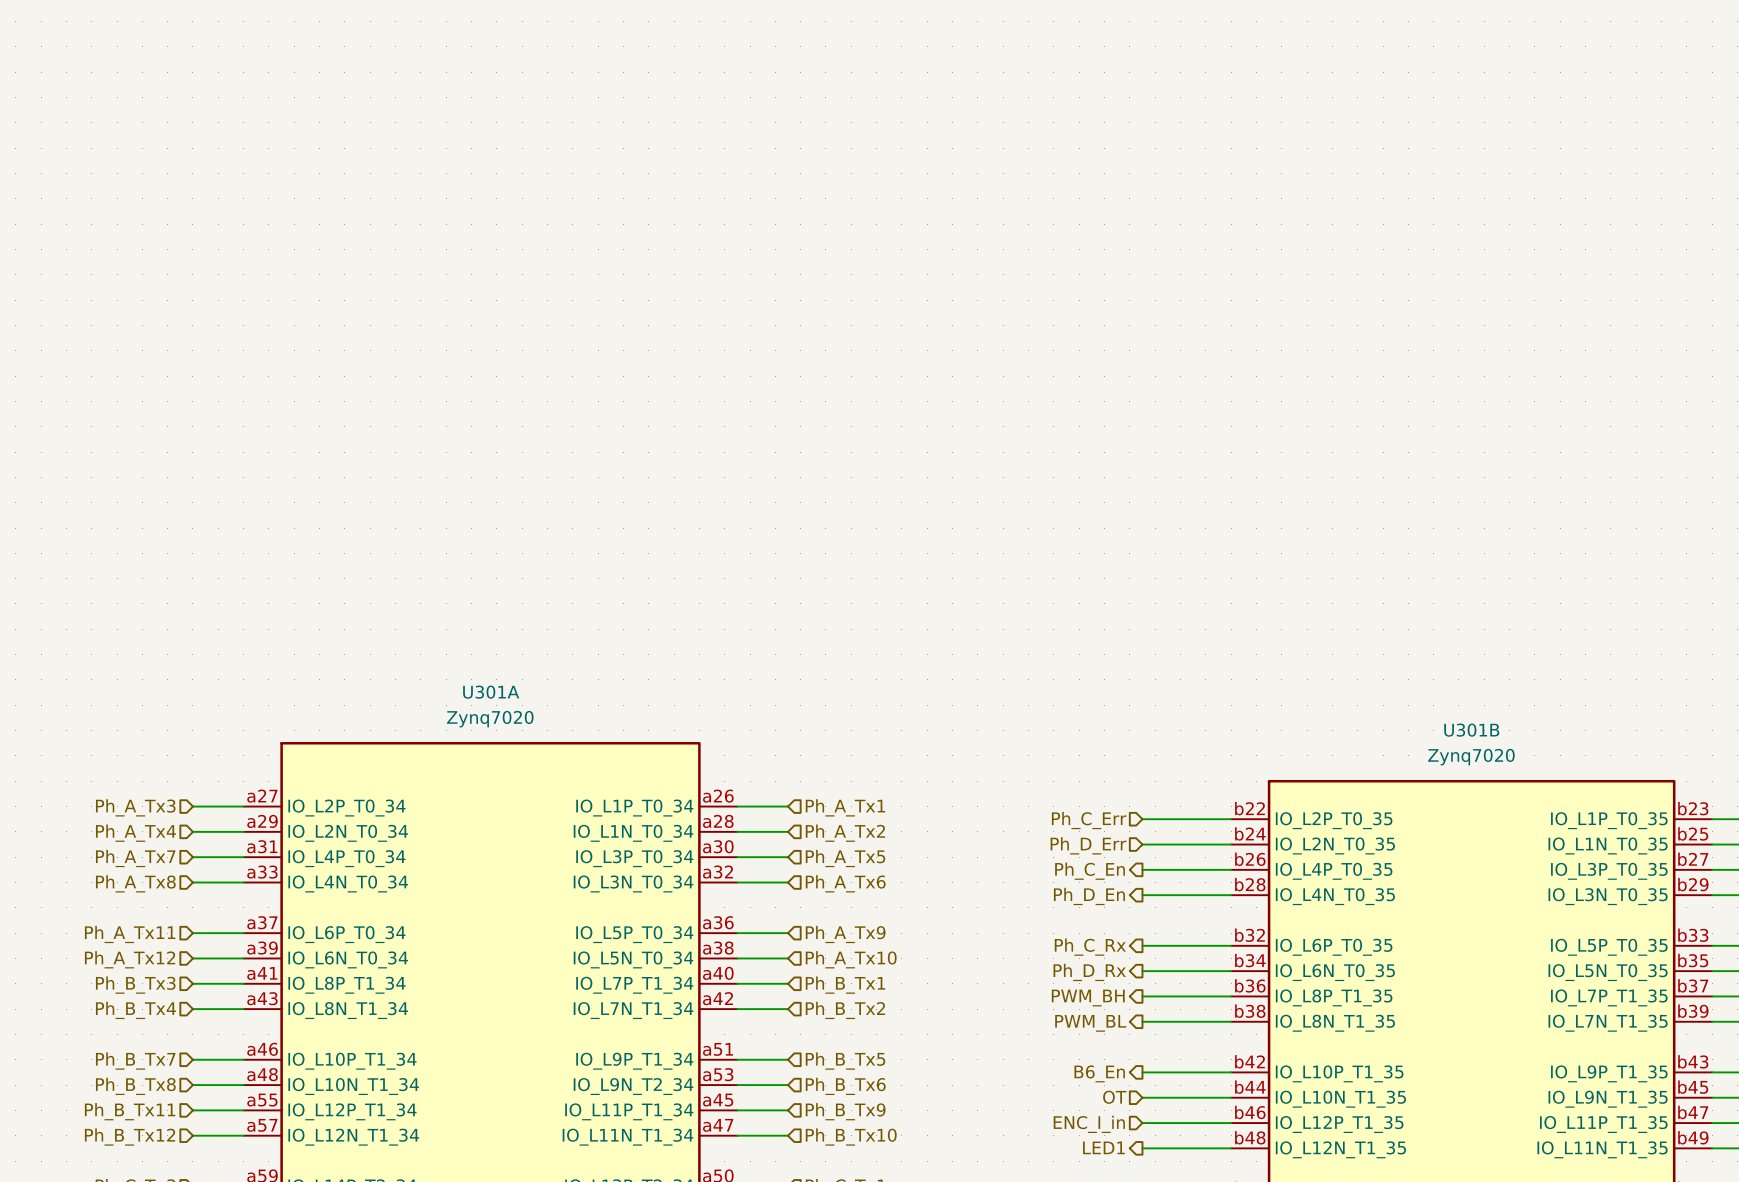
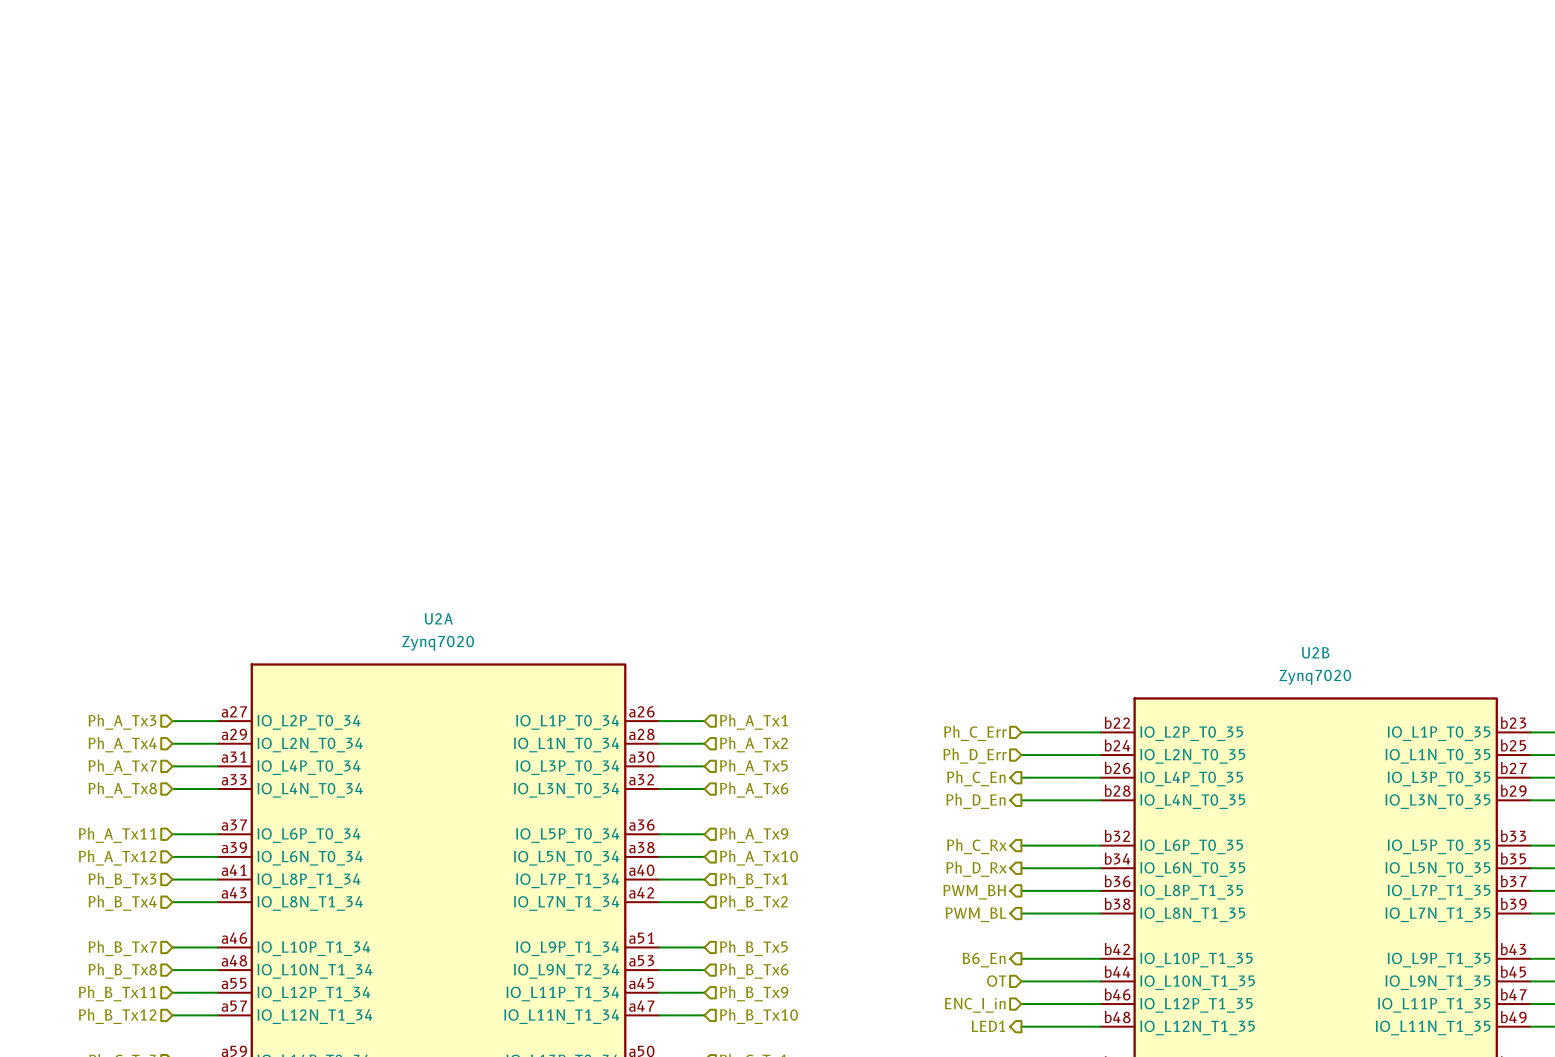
U301A name: U301A (491, 692) -> U2A (438, 618)
U301B name: U301B (1471, 730) -> U2B (1315, 652)

